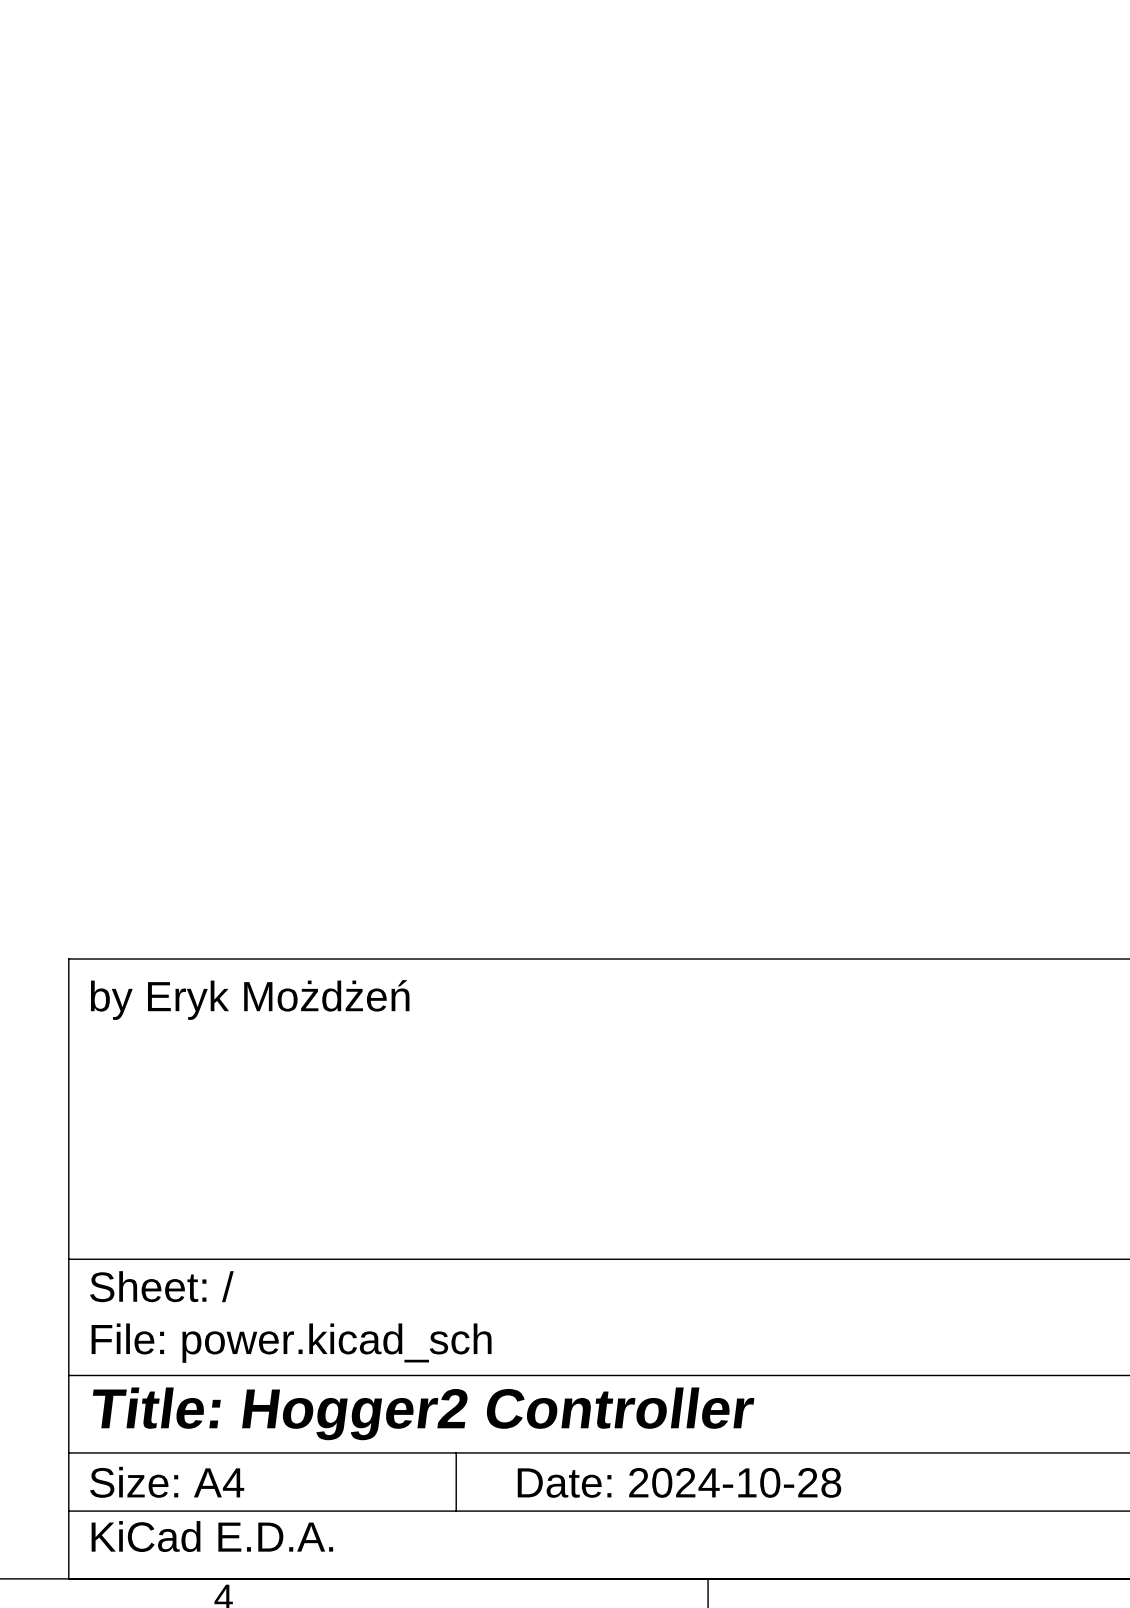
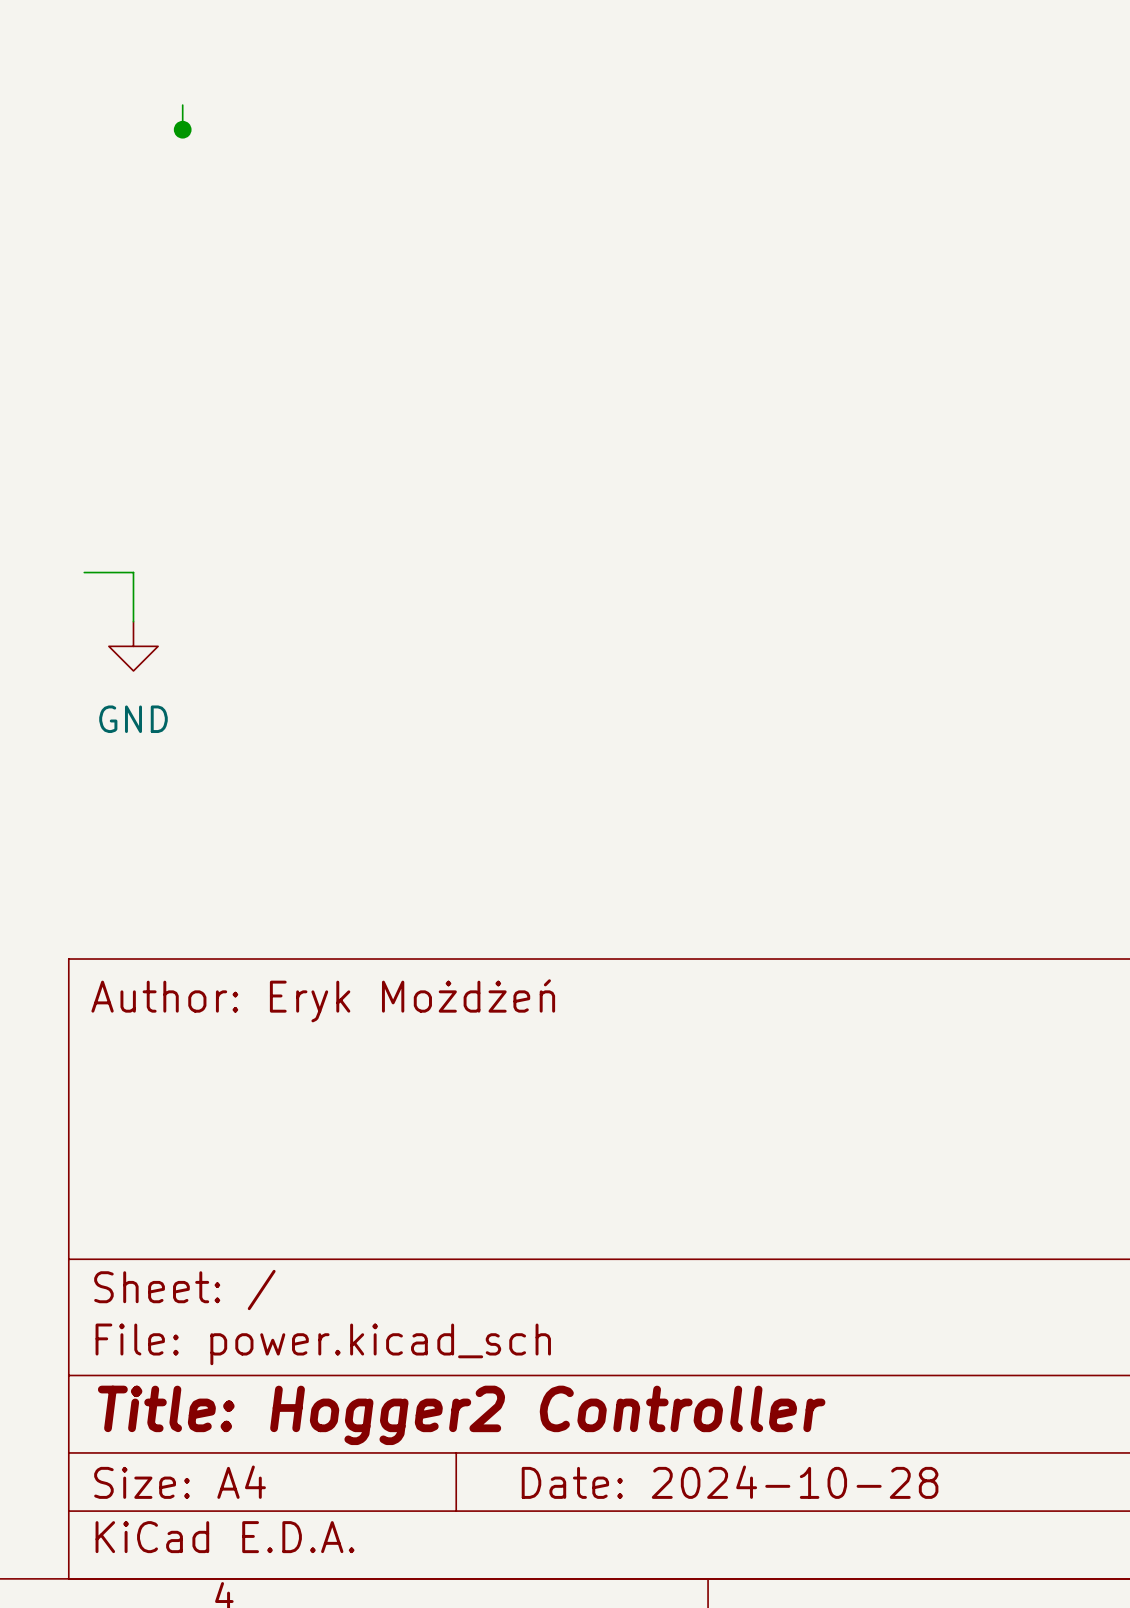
wire: none -> (182, 105) (182, 129)
junction: none -> (182, 129)
wire: none -> (84, 572) (133, 572) (133, 621)
power symbol: none -> GND (133, 646)
title block: by Eryk Możdżeń (250, 1000) -> Author: Eryk Możdżeń (323, 1000)

